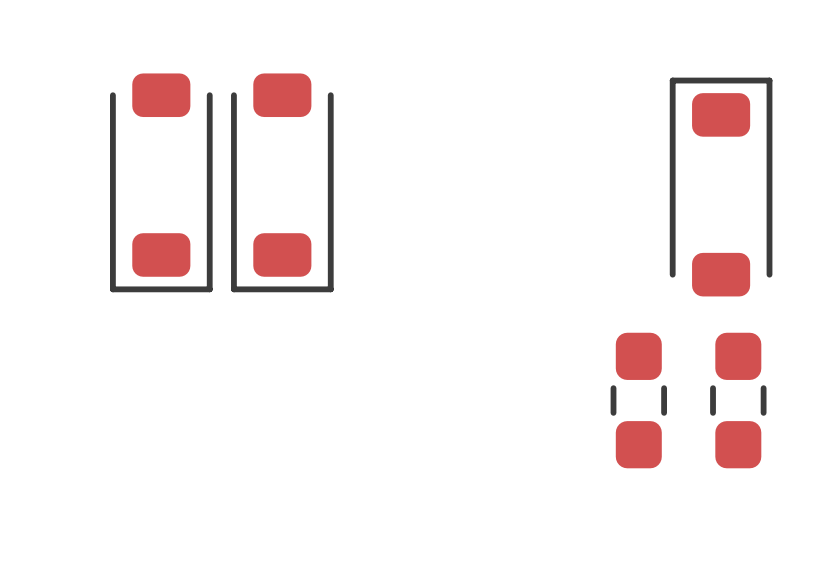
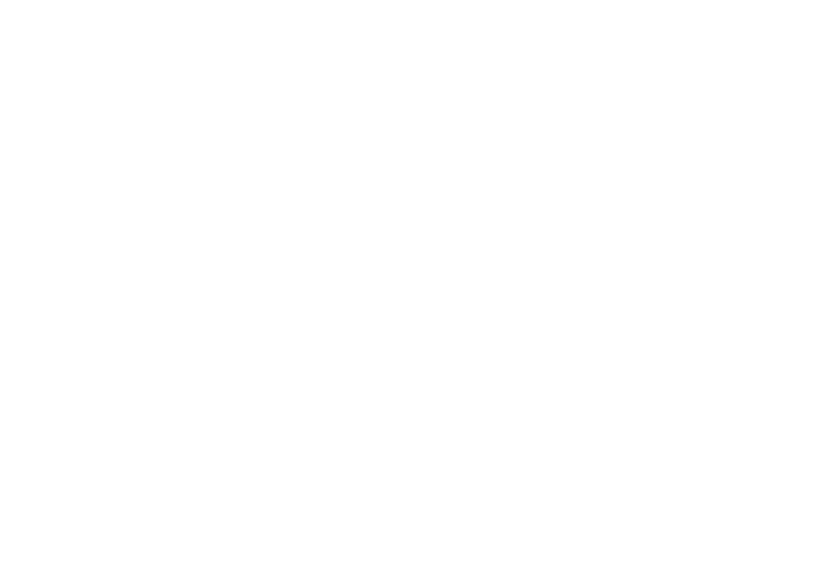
part: (161, 182) -> none
part: (282, 182) -> none
part: (721, 187) -> none
part: (638, 400) -> none
part: (738, 400) -> none

